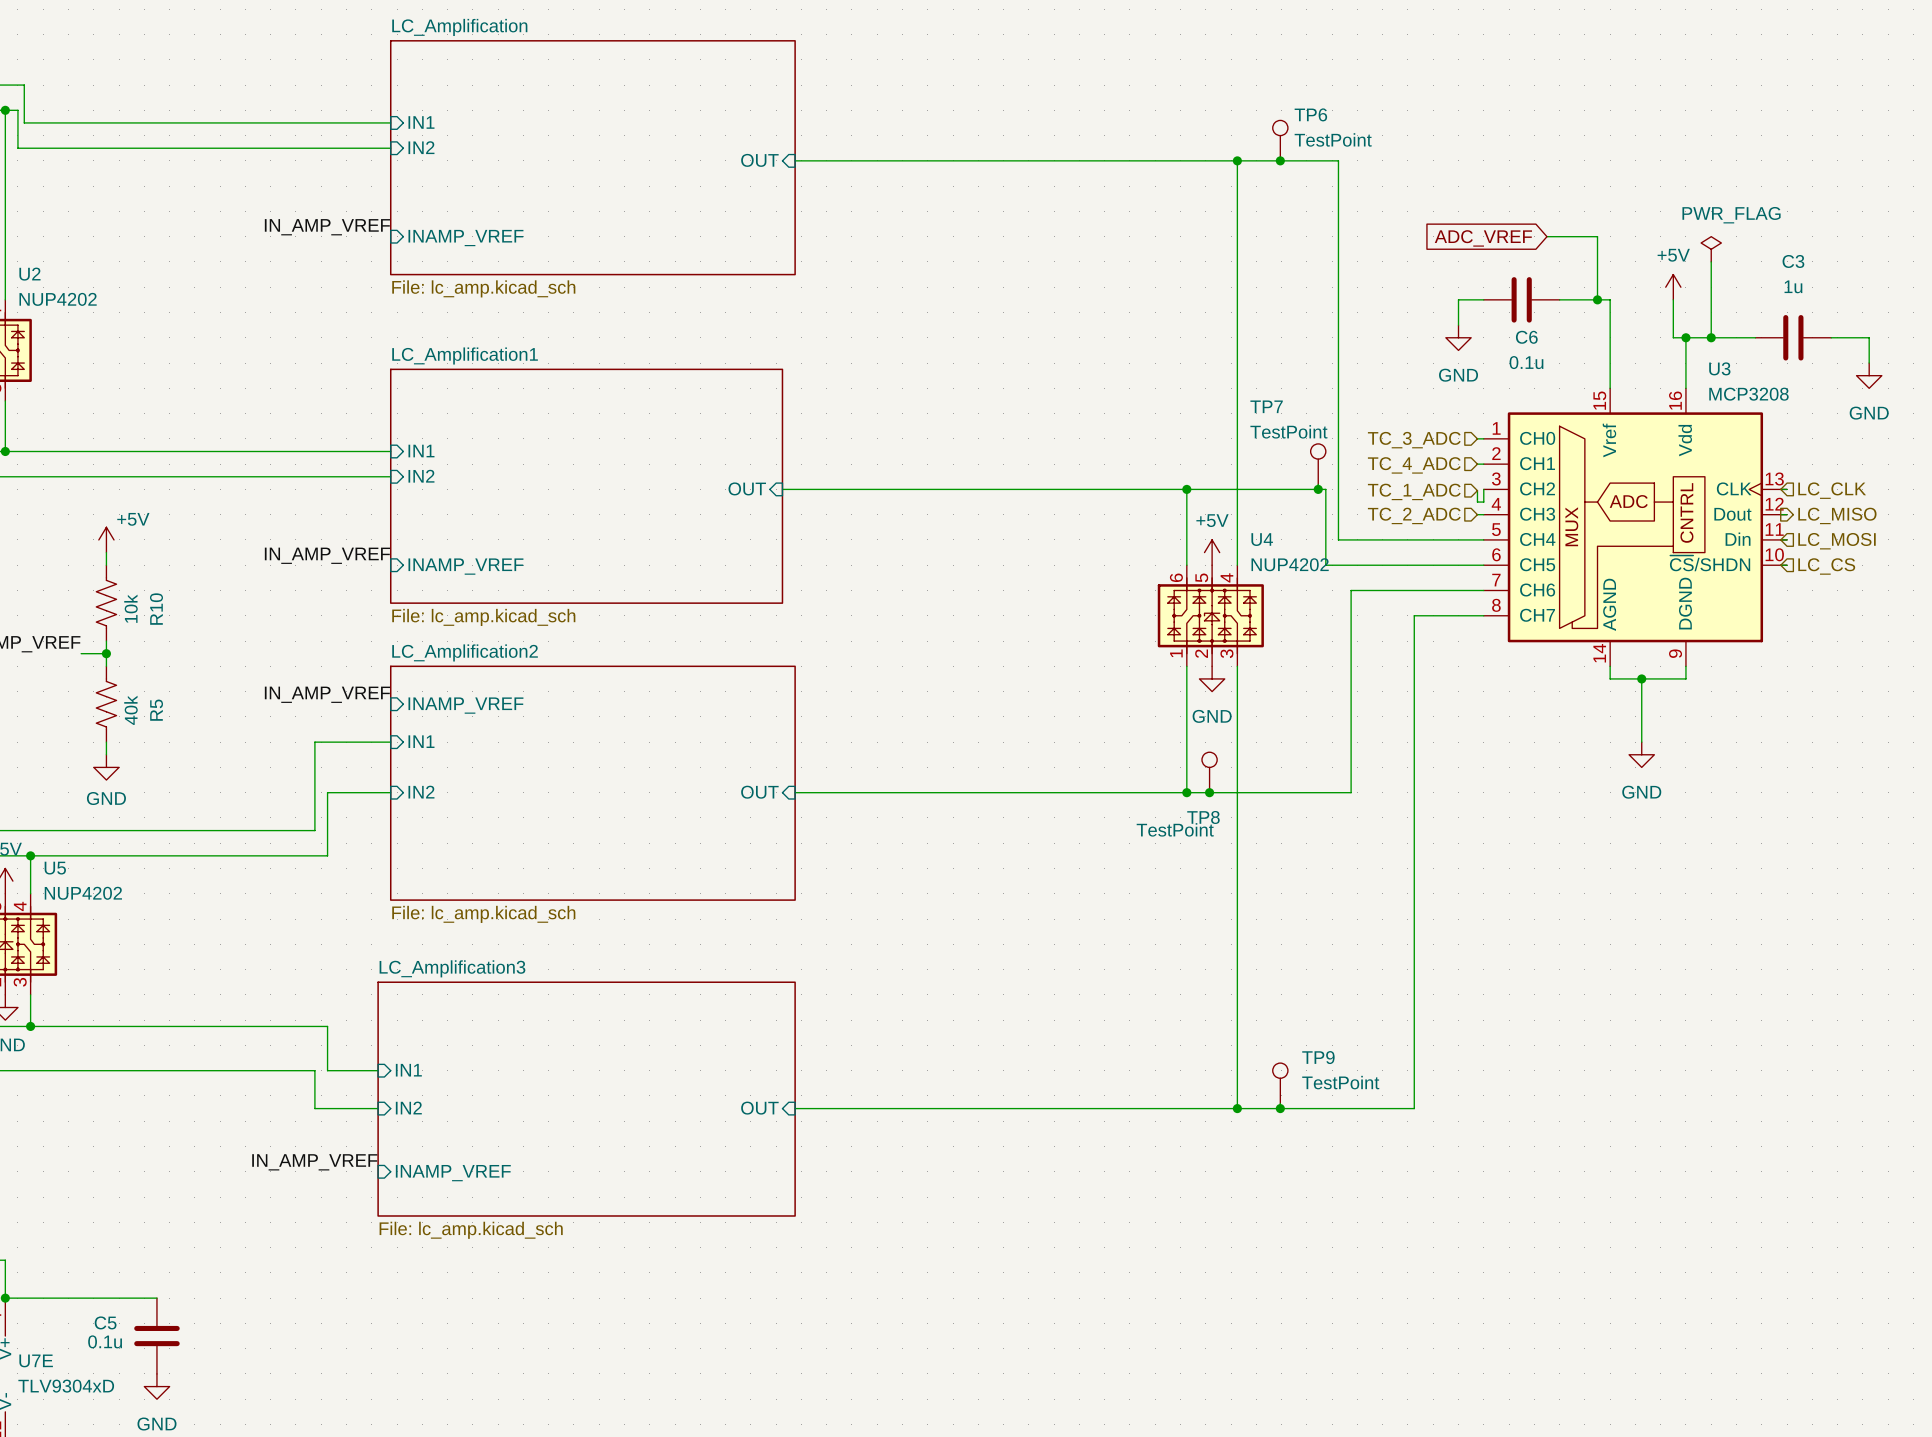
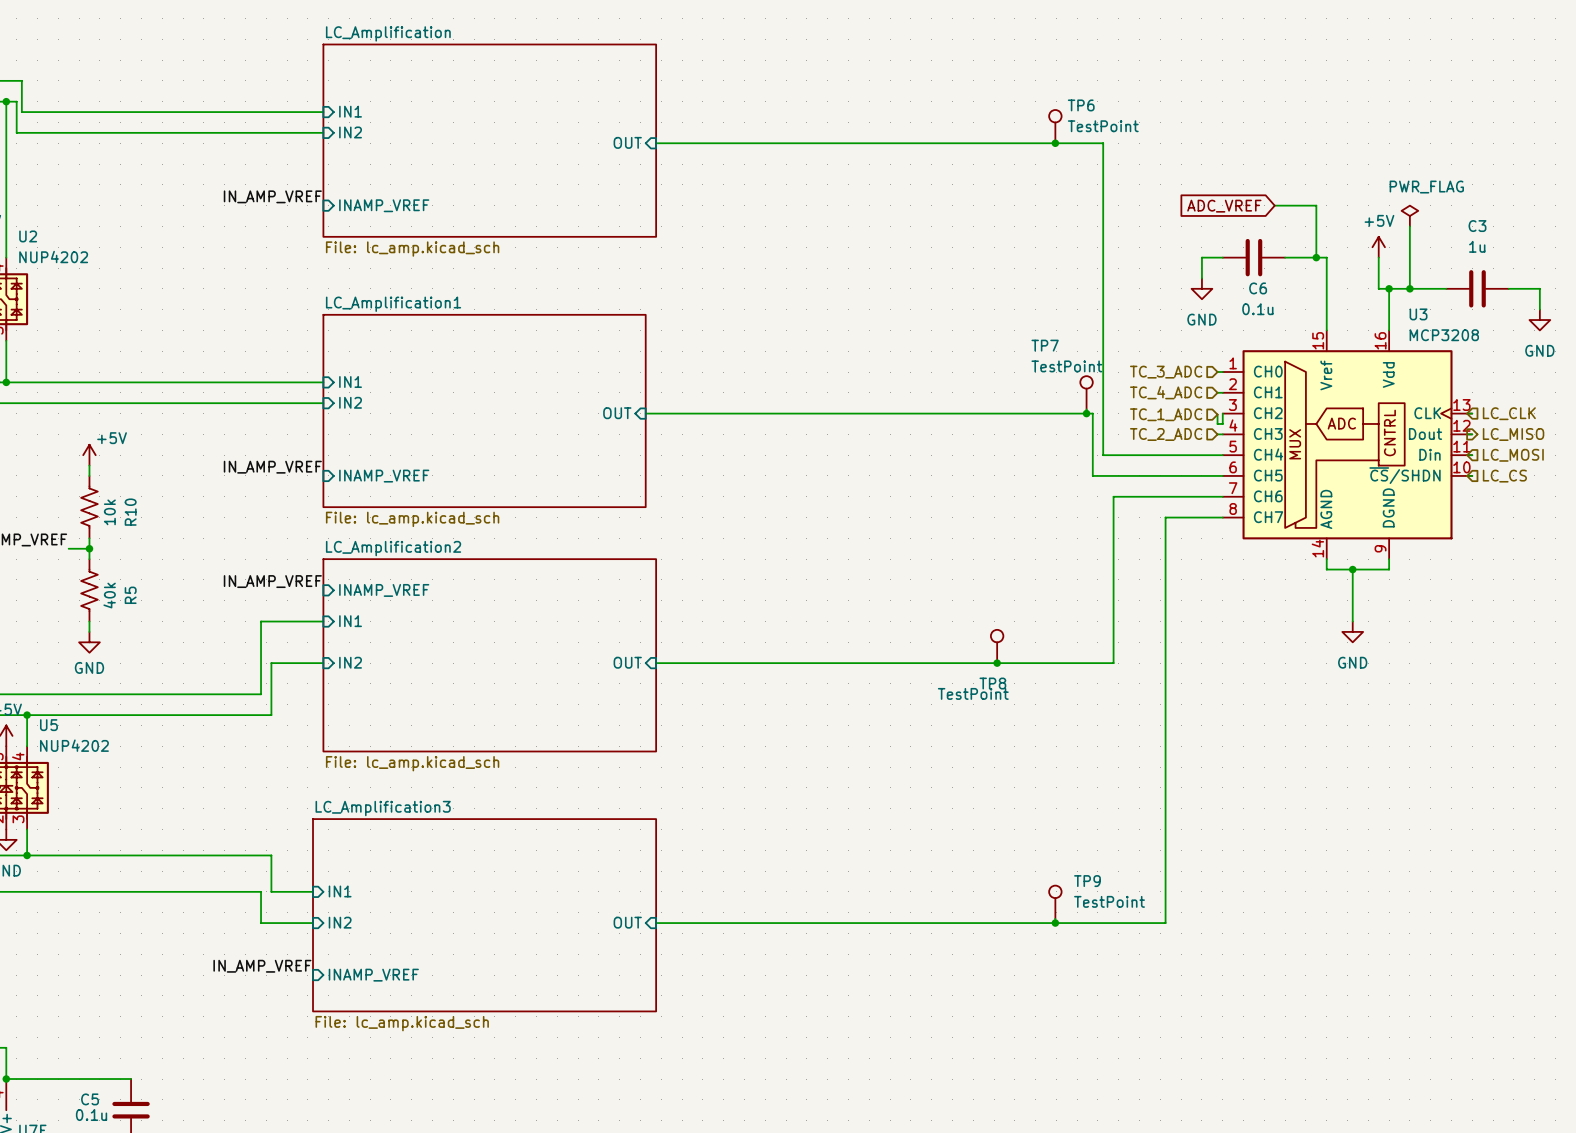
wire: (1237, 160) (1237, 565) -> none
junction: (1237, 160) -> none
wire: (1186, 489) (1186, 565) -> none
junction: (1186, 489) -> none
power symbol: +5V (1212, 552) -> none
U4: NUP4202 (1210, 615) -> none
wire: (1186, 666) (1186, 792) -> none
wire: (1237, 666) (1237, 1108) -> none
power symbol: GND (1212, 678) -> none
junction: (1186, 792) -> none
junction: (1237, 1108) -> none

